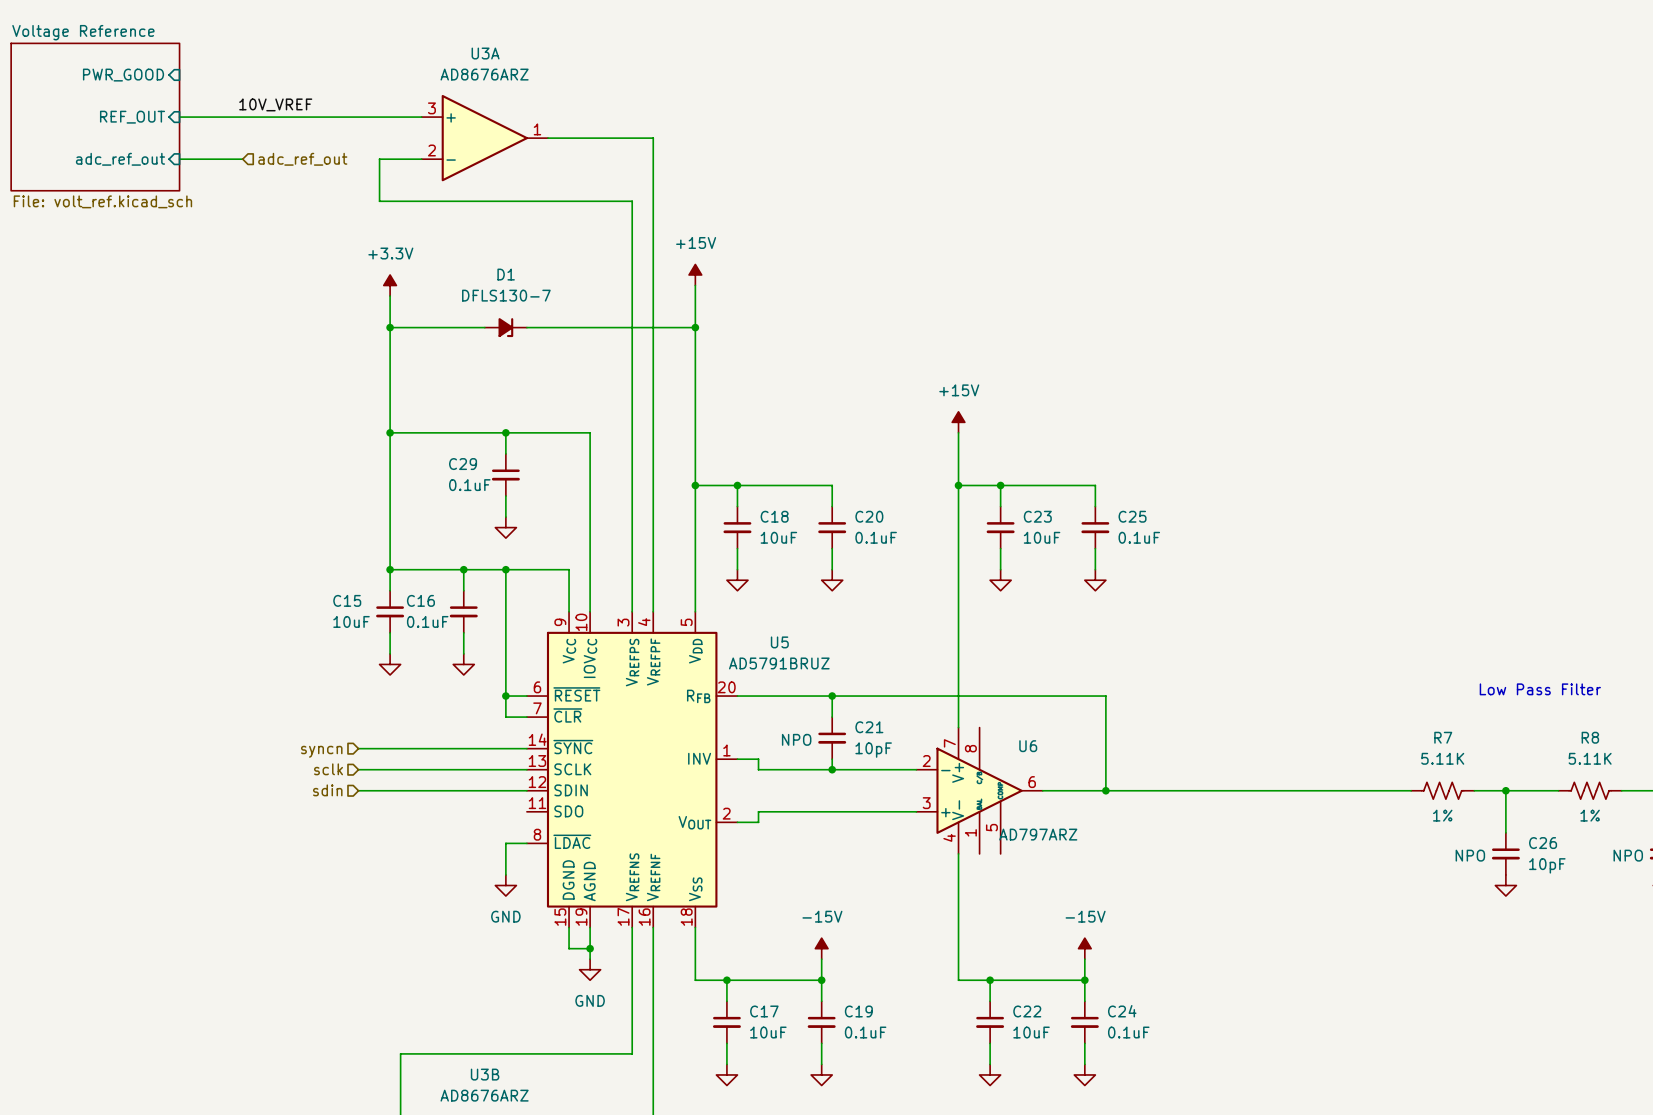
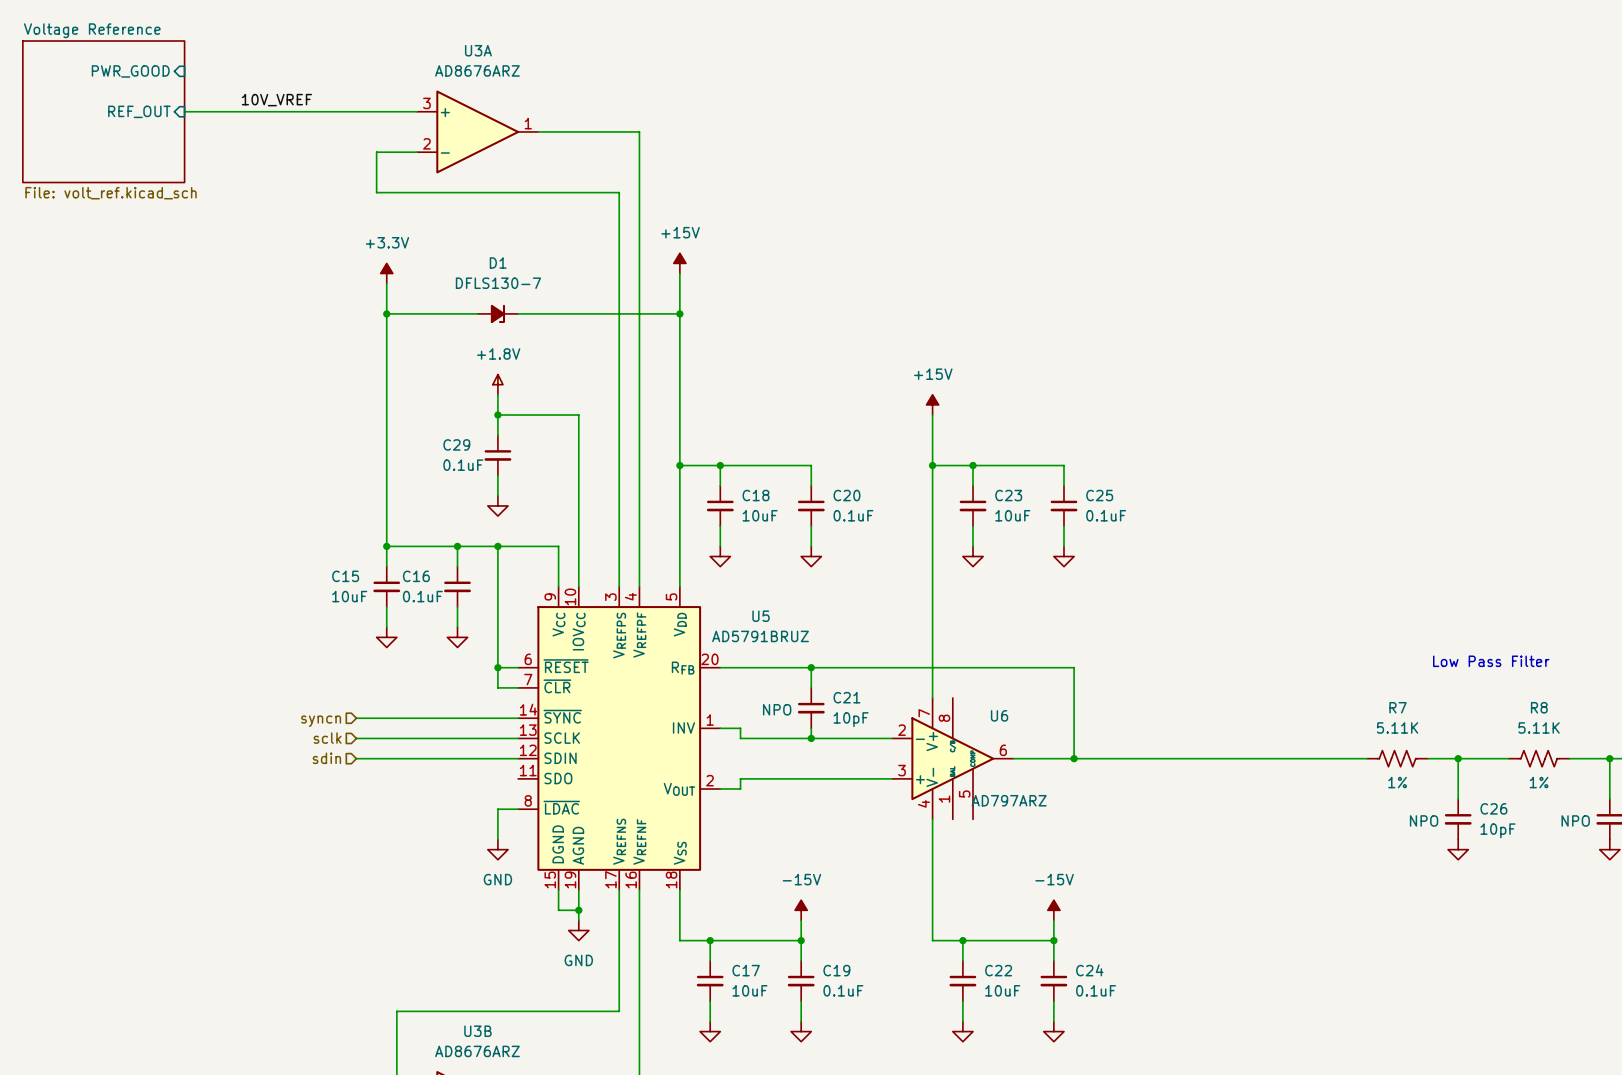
sheet pin: adc_ref_out (120, 159) -> none
wire: (179, 159) (242, 159) -> none
hierarchical label: adc_ref_out (302, 159) -> none
power symbol: none -> +1.8V (497, 384)
wire: (390, 432) (505, 432) -> (497, 394) (497, 415)
junction: (390, 432) -> none

